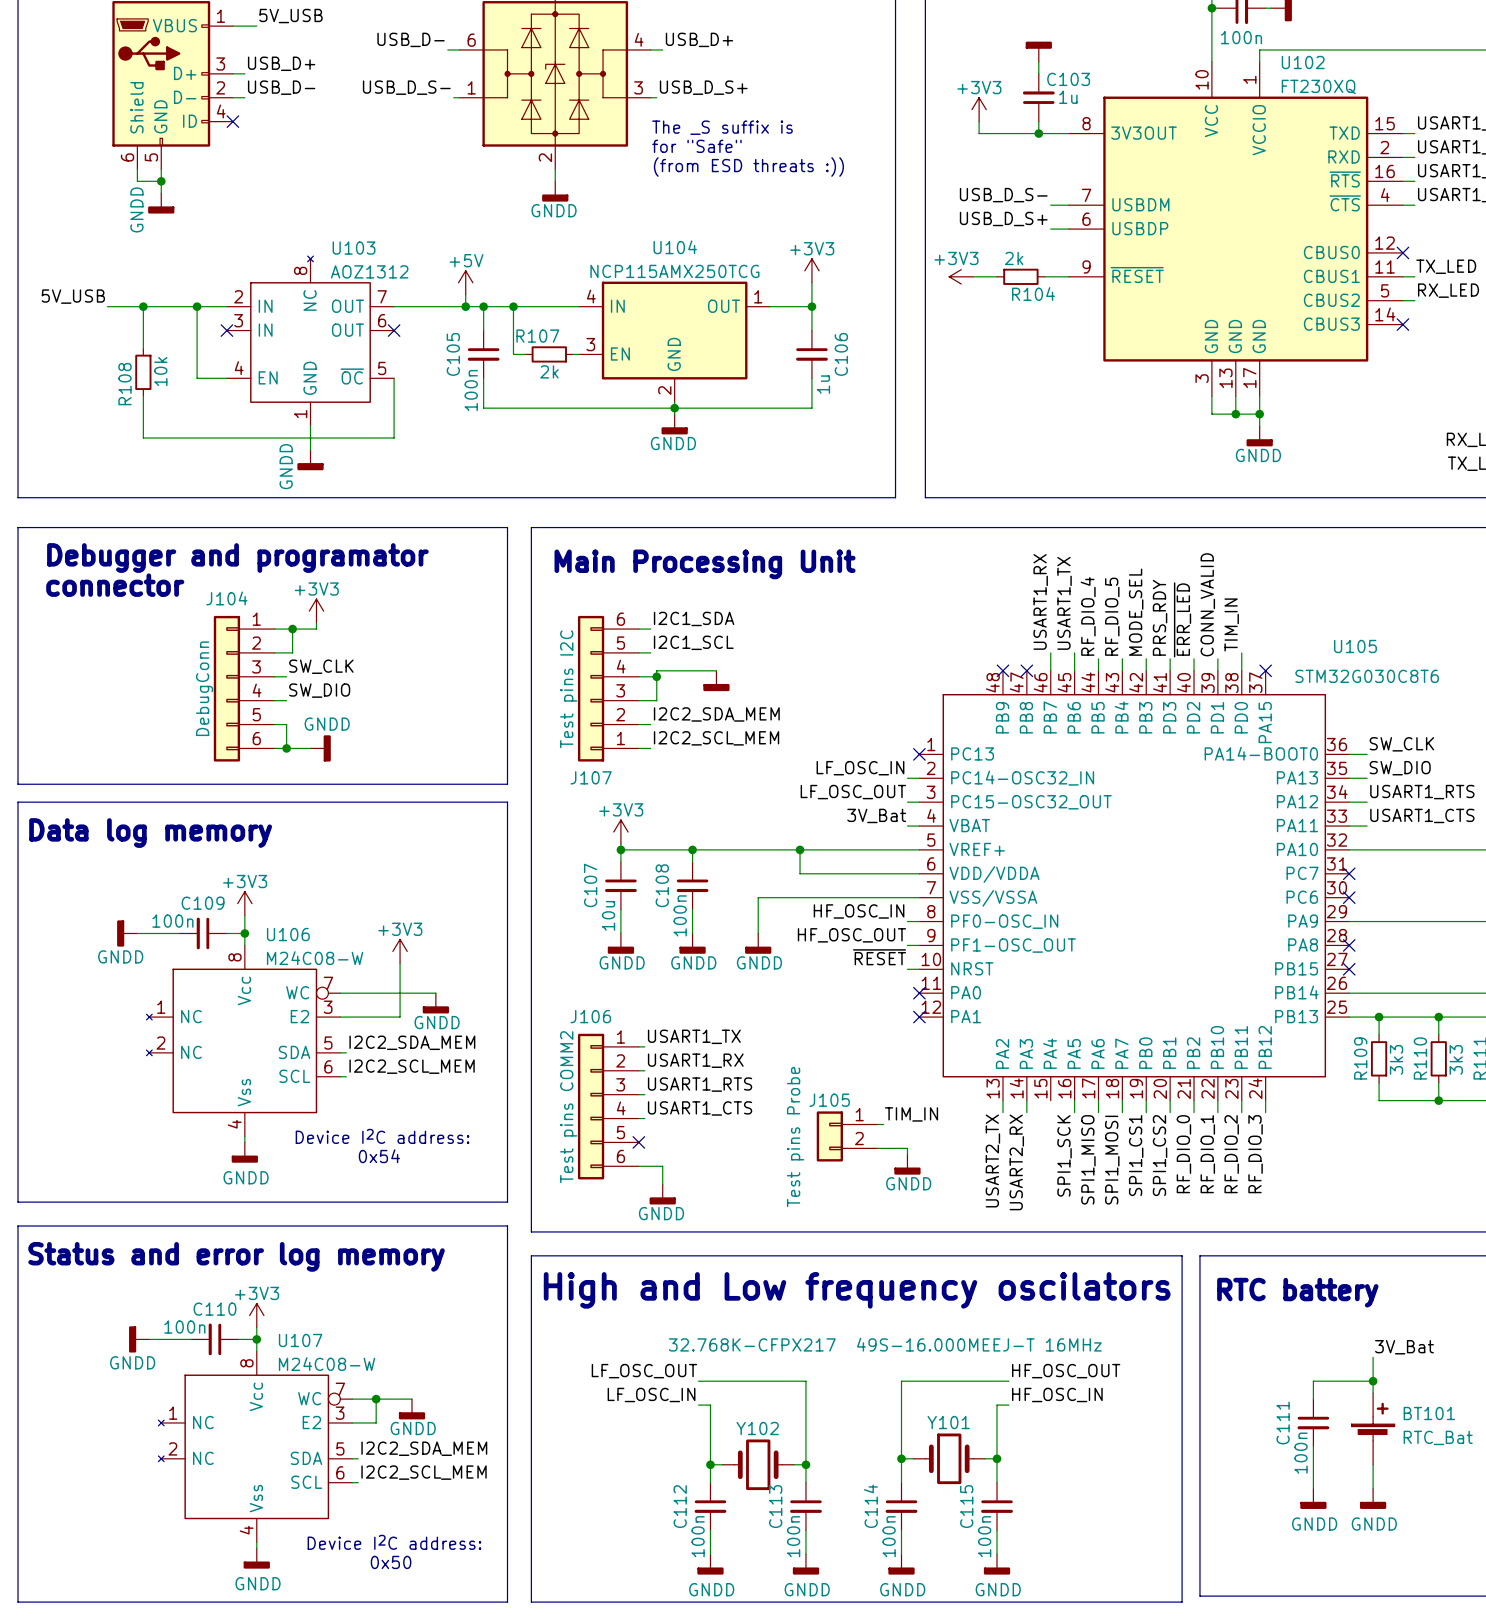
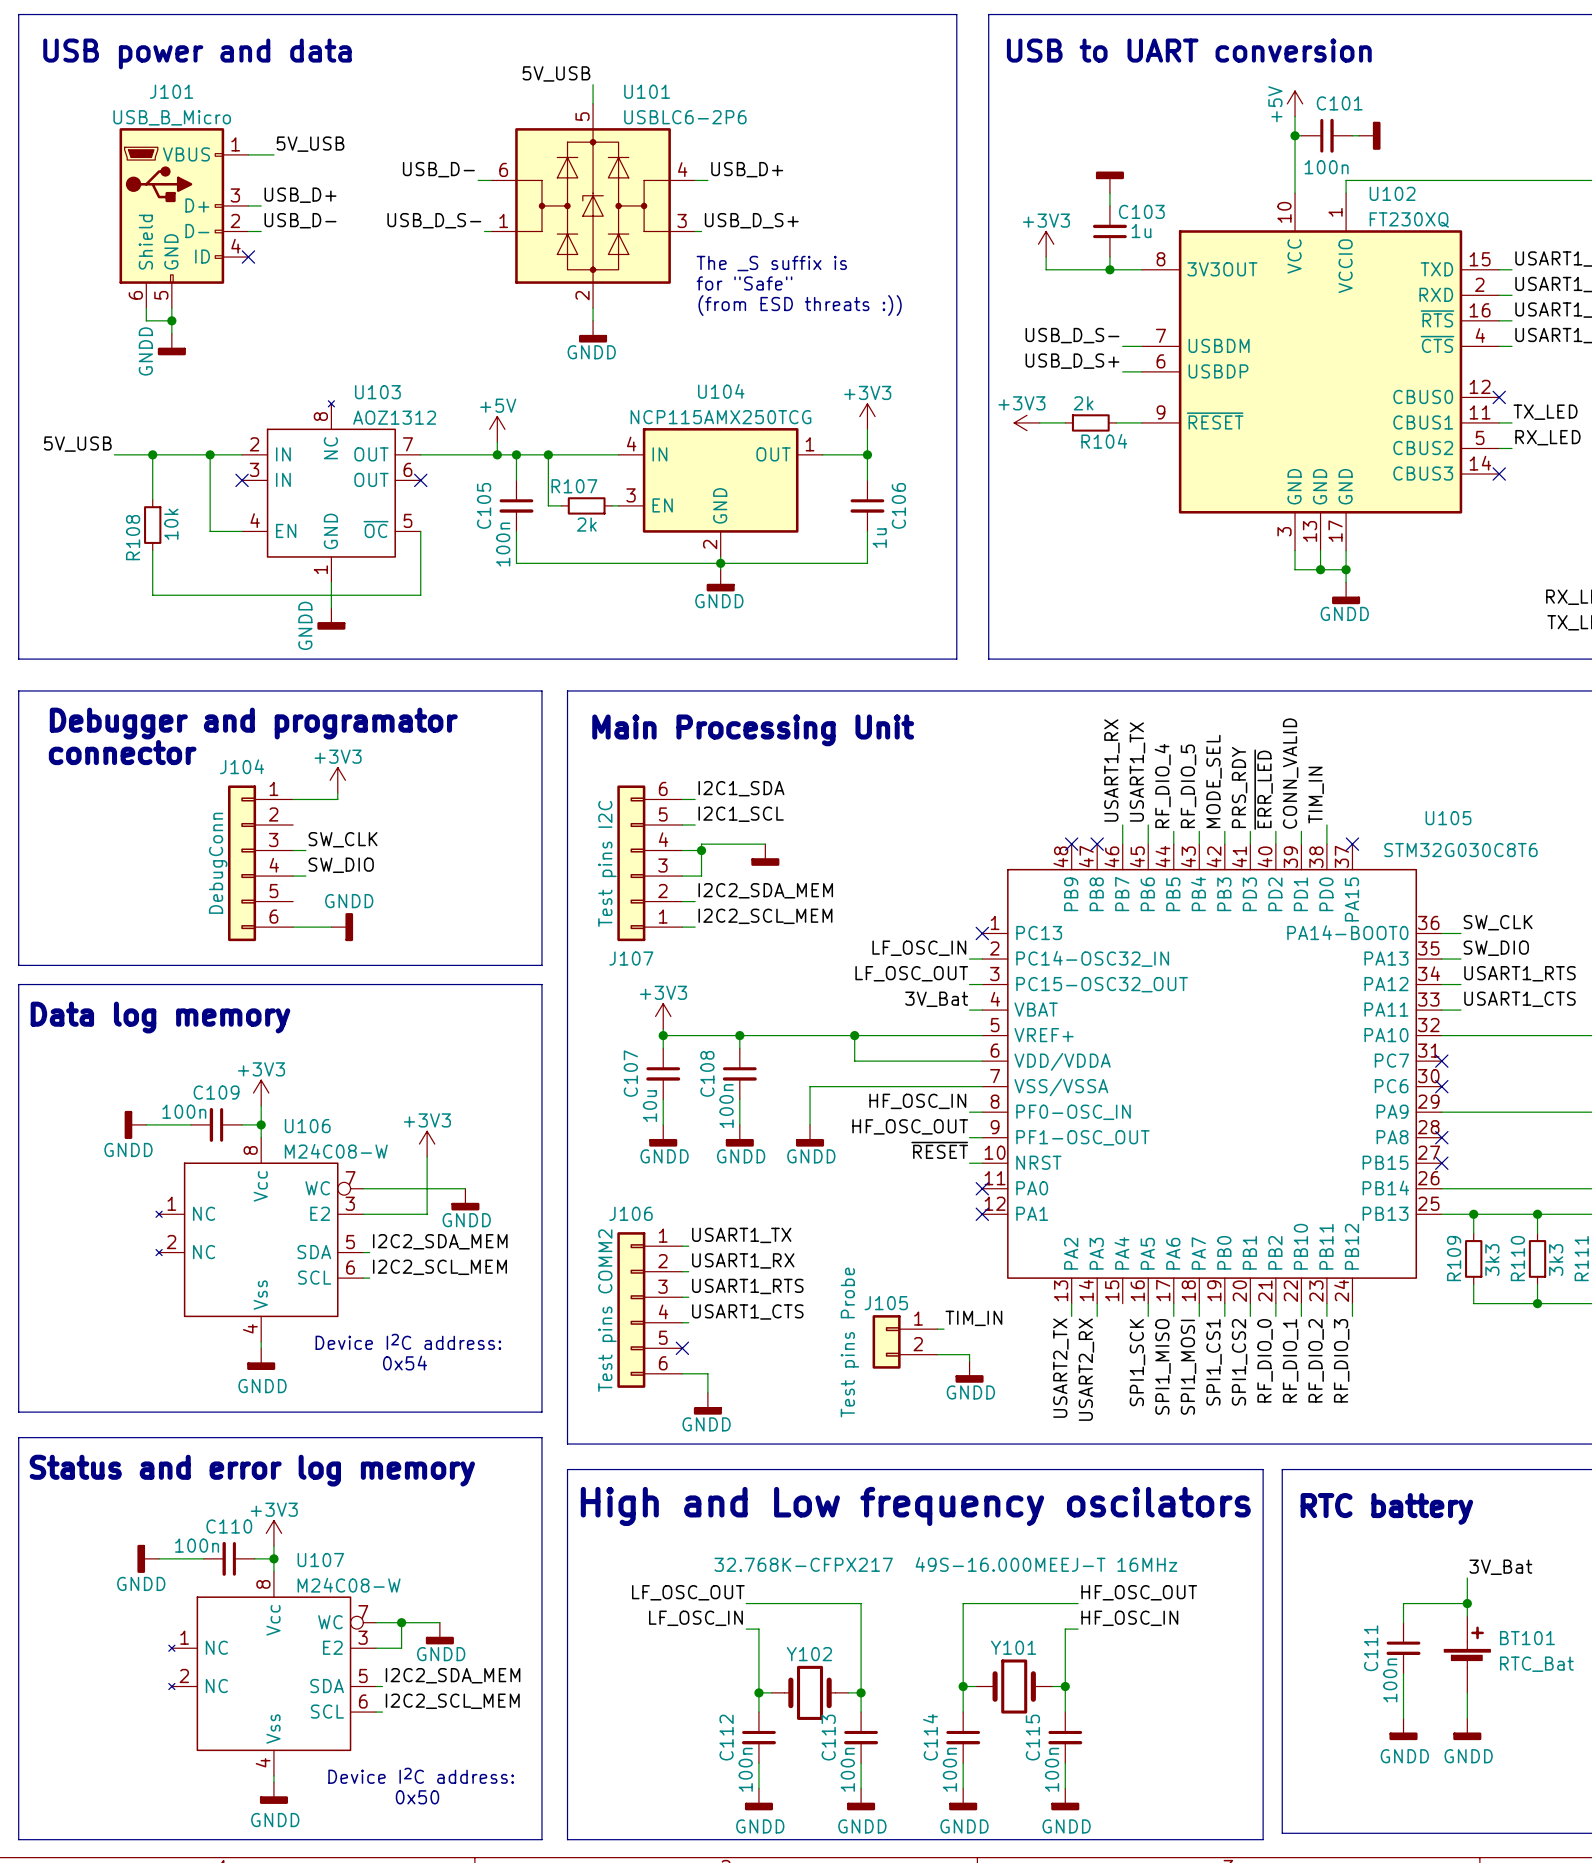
wire: (292, 629) (292, 652) (274, 652) -> none
junction: (292, 629) -> none
wire: (274, 724) (286, 724) (286, 748) -> none
junction: (286, 748) -> none

